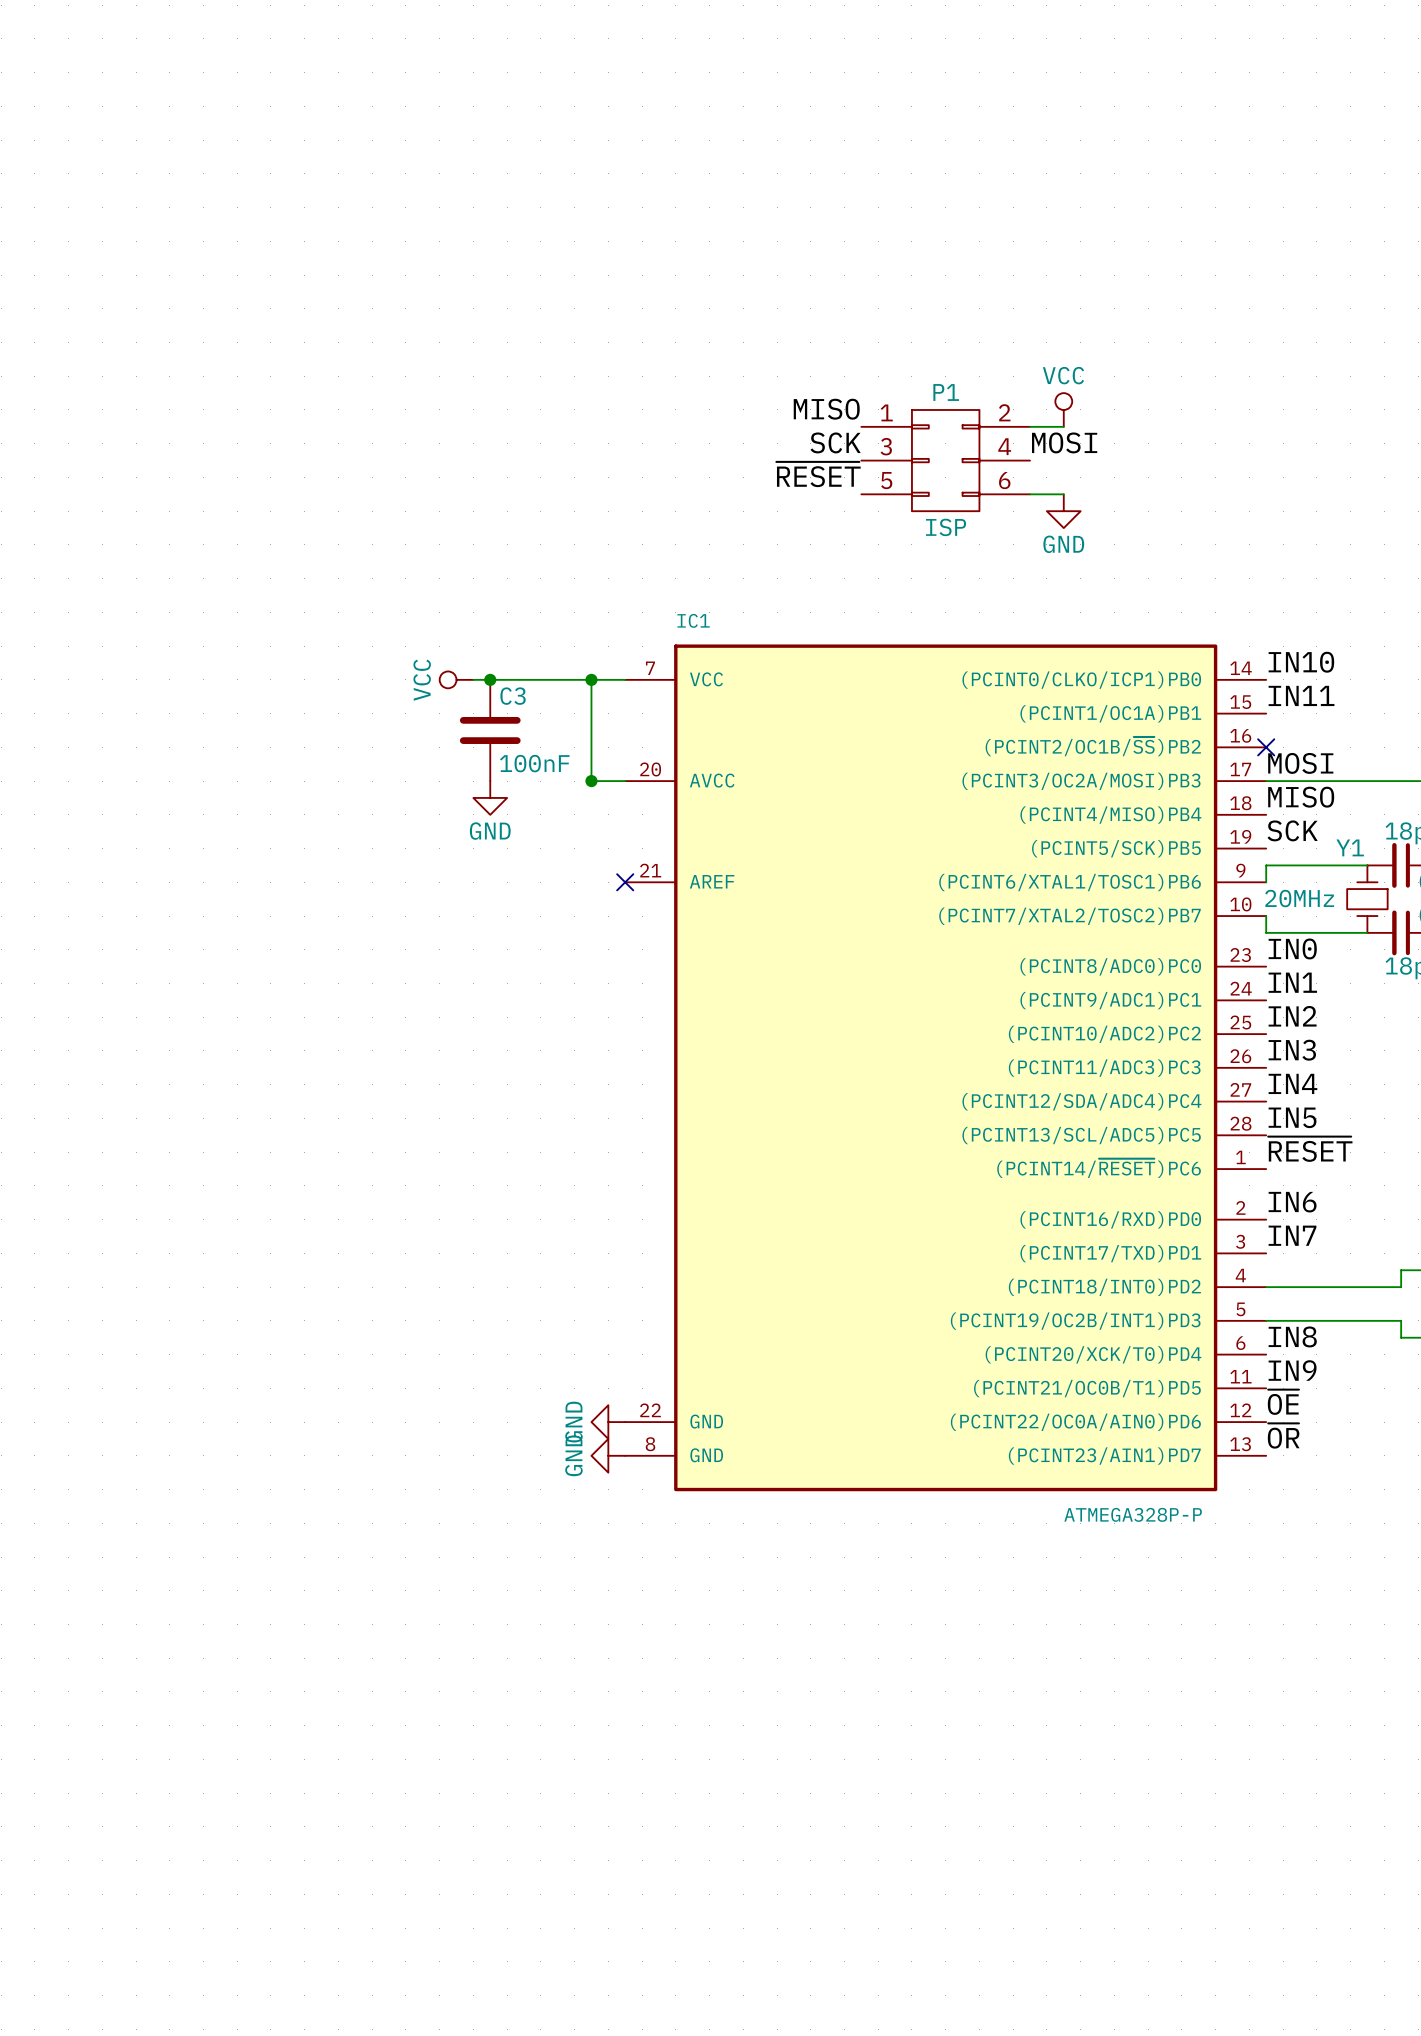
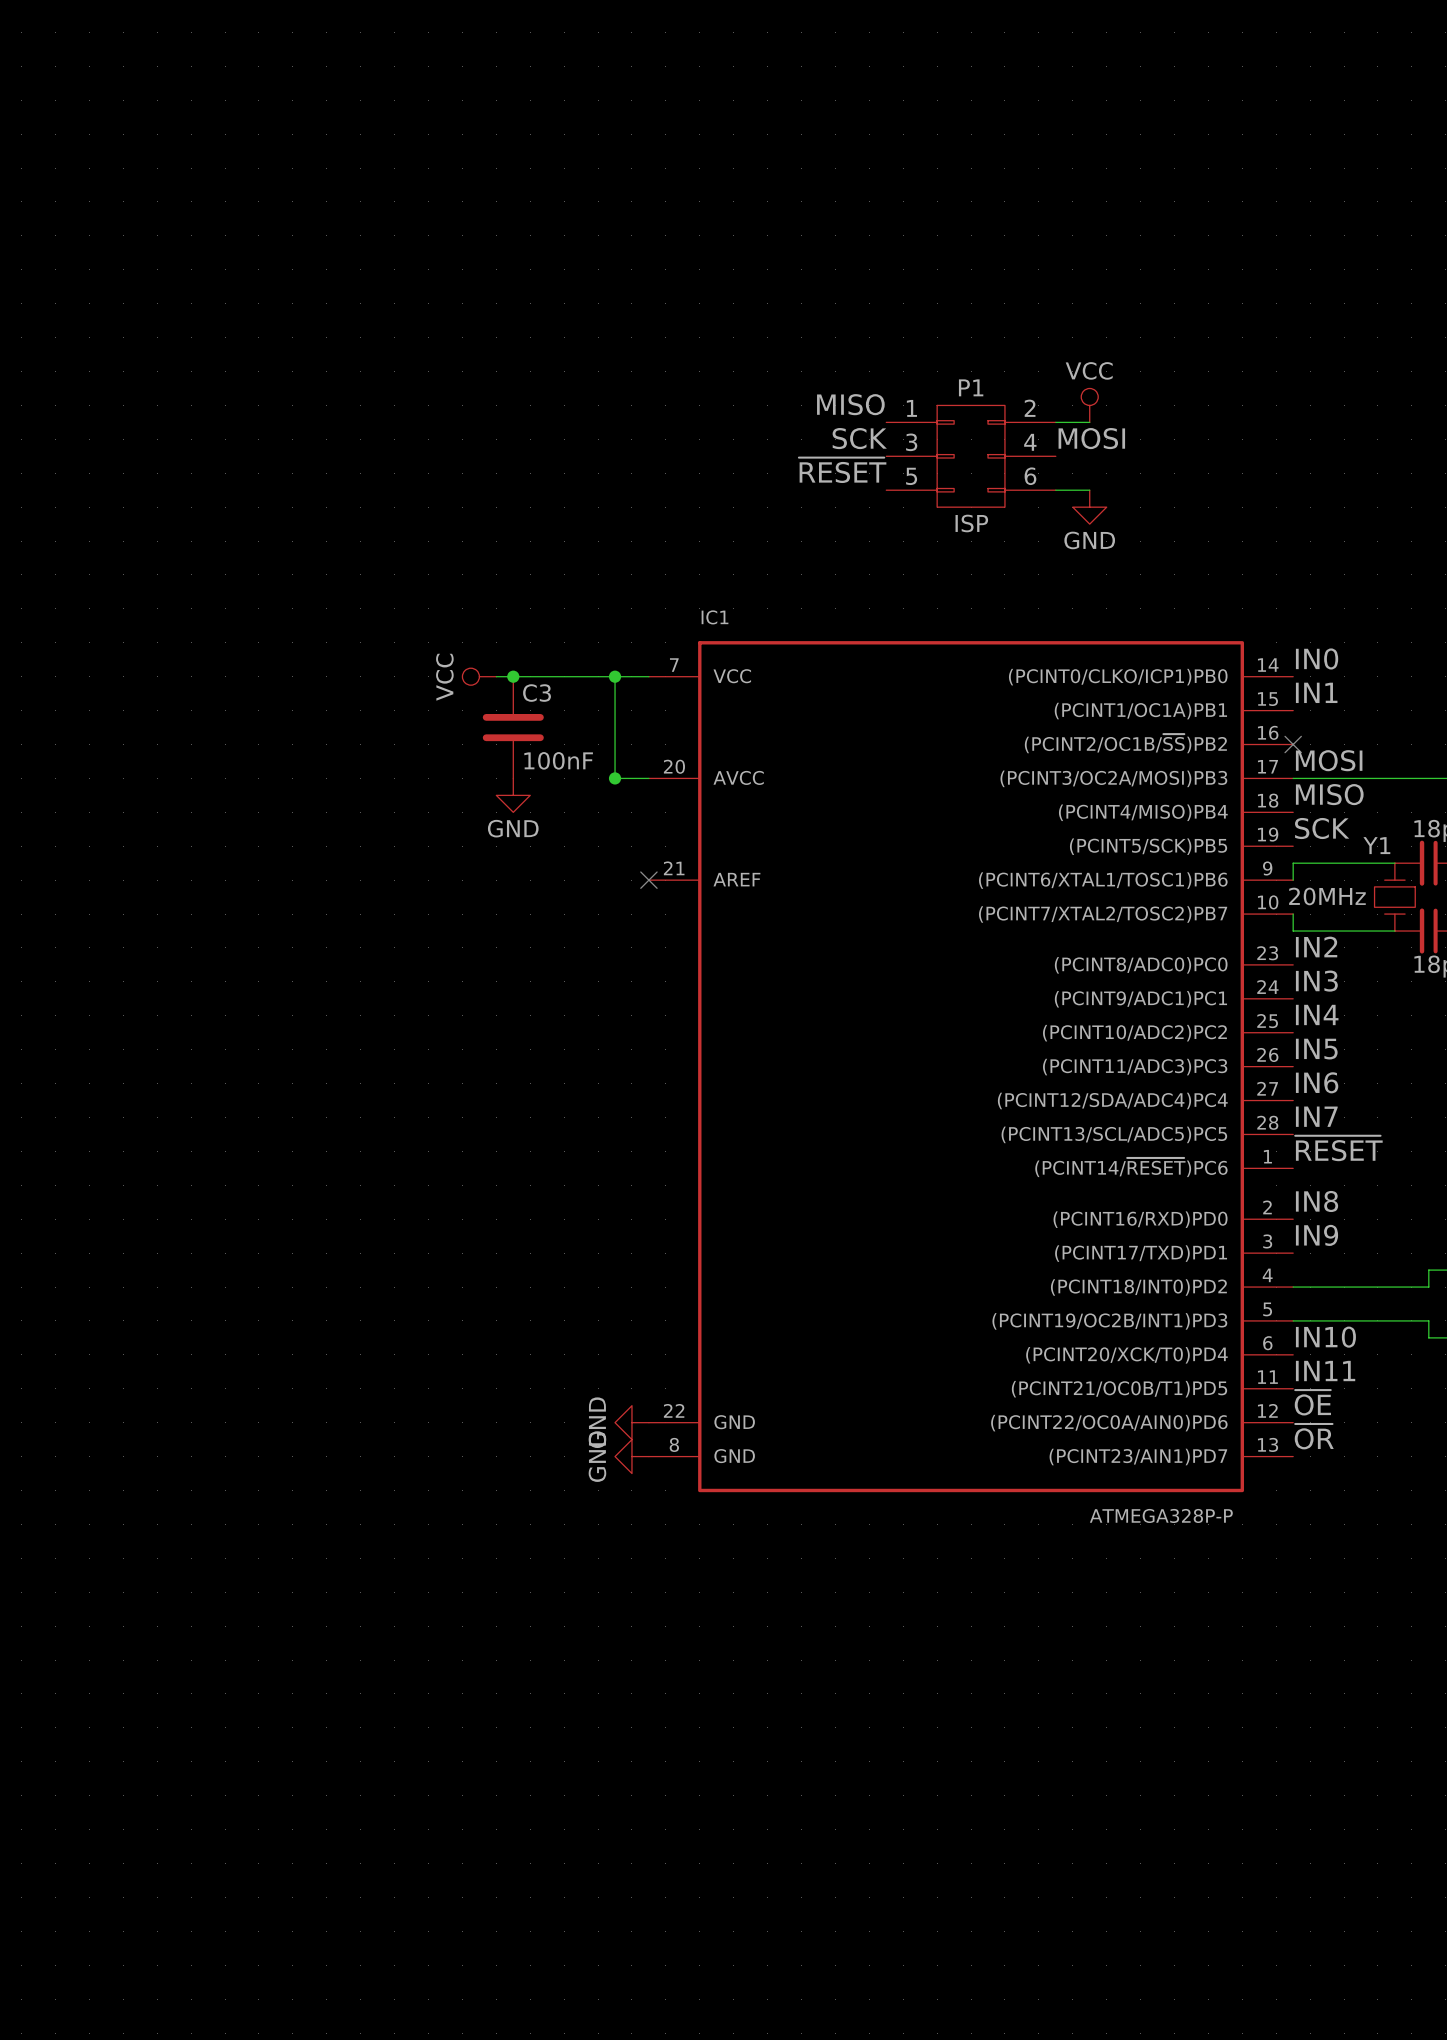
label: IN10 (1301, 662) -> IN0 (1317, 658)
label: IN11 (1301, 695) -> IN1 (1316, 692)
label: IN0 (1292, 948) -> IN2 (1316, 946)
label: IN1 (1292, 982) -> IN3 (1316, 981)
label: IN2 (1292, 1016) -> IN4 (1317, 1014)
label: IN3 (1292, 1050) -> IN5 (1316, 1049)
label: IN4 (1292, 1083) -> IN6 (1317, 1082)
label: IN5 (1292, 1117) -> IN7 (1316, 1116)
label: IN6 (1292, 1202) -> IN8 (1317, 1201)
label: IN7 (1292, 1235) -> IN9 (1317, 1235)
label: IN8 (1292, 1336) -> IN10 (1325, 1337)
label: IN9 (1292, 1370) -> IN11 (1325, 1371)

